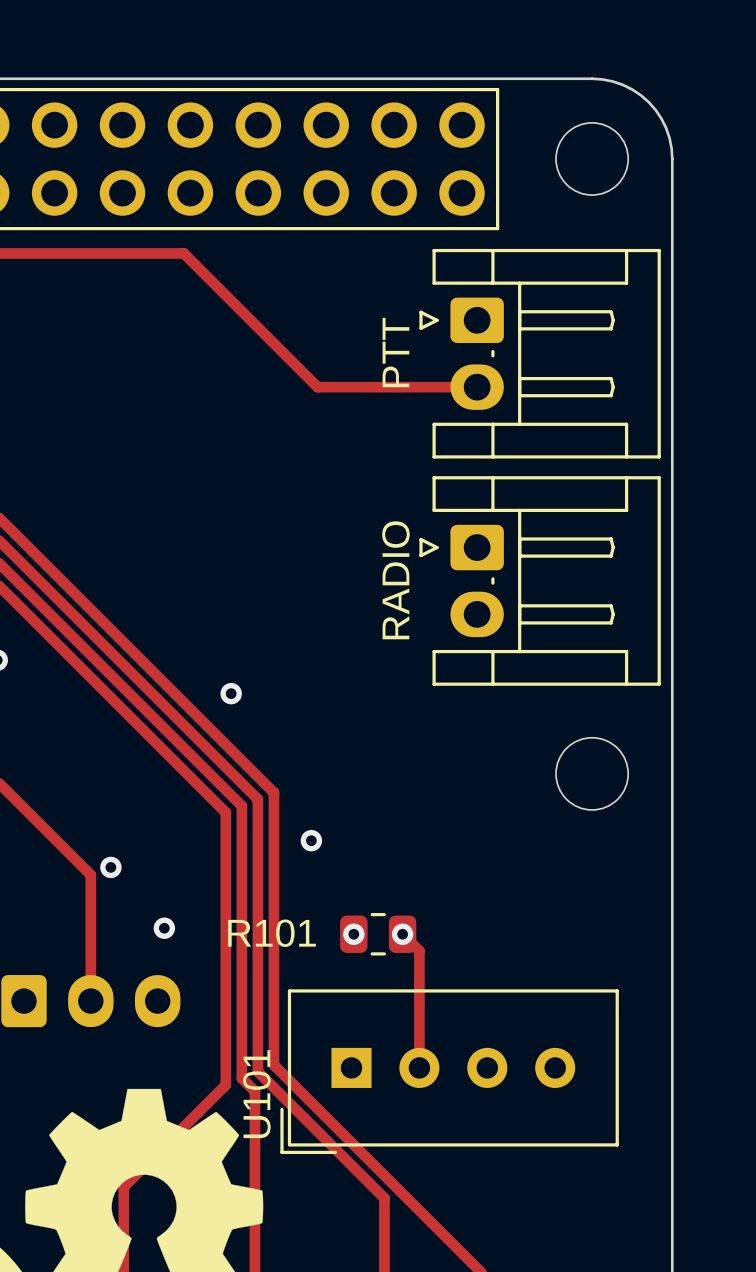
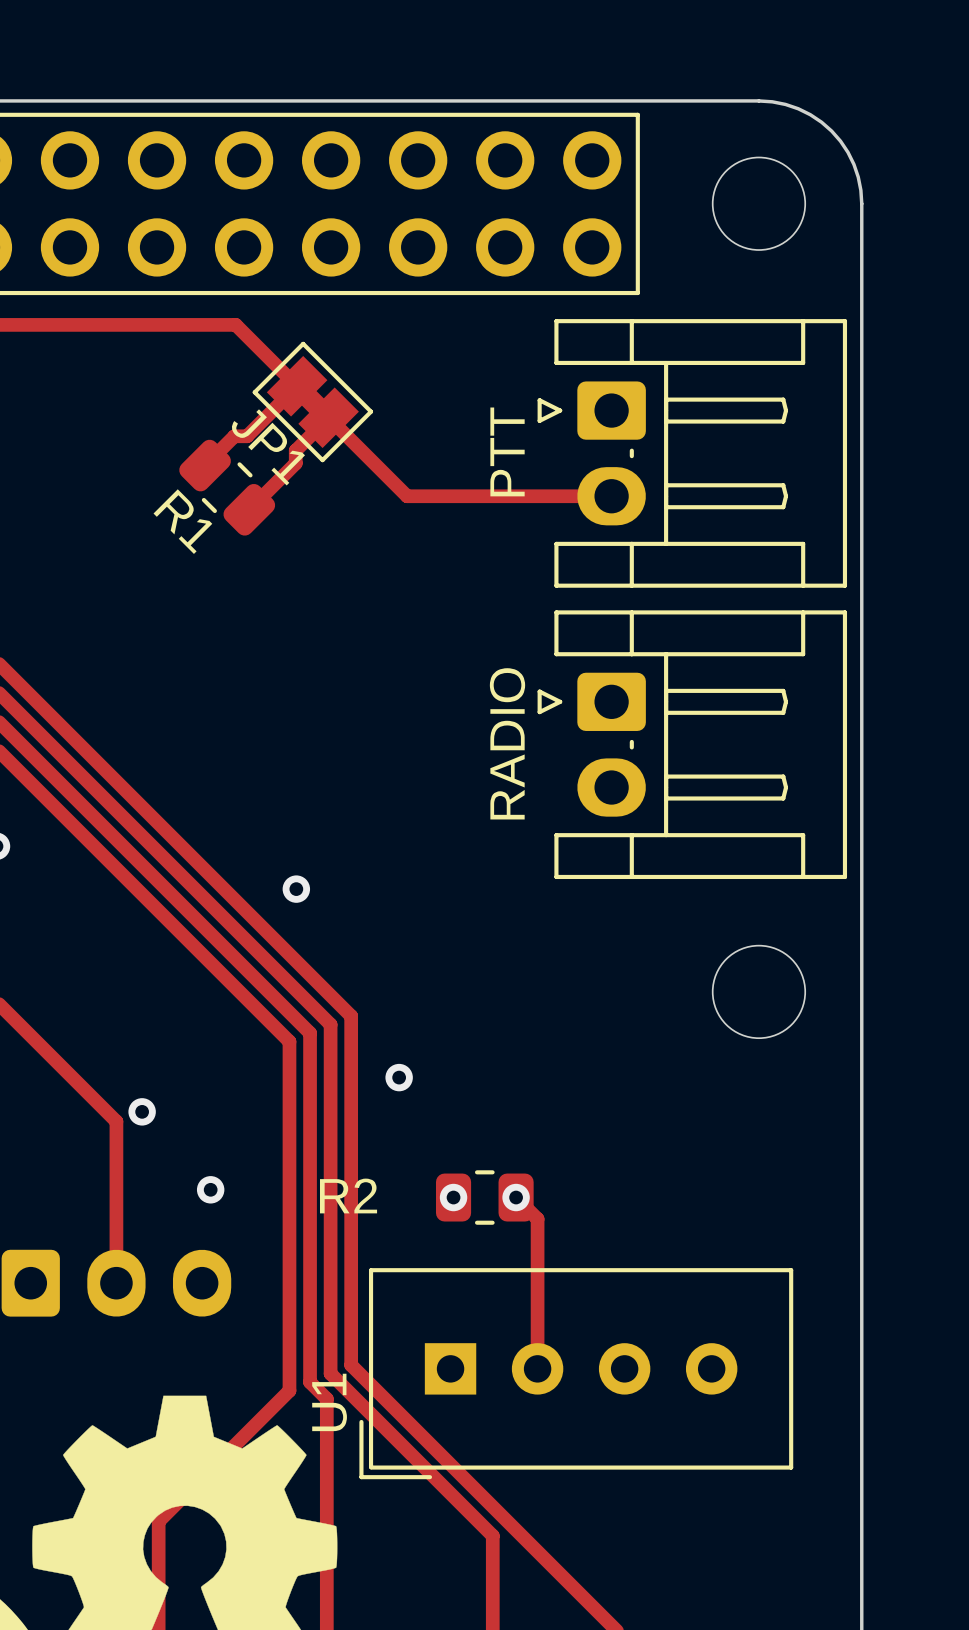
track: (231, 301) (256, 325) -> (249, 509) (295, 463) (295, 450) (328, 417)
track: none -> (297, 386) (247, 436) (234, 436) (205, 465)
JP1: none -> (312, 402)
R1: none -> (227, 487)
R101 name: R101 (271, 933) -> R2 (348, 1195)
U101 name: U101 (256, 1094) -> U1 (329, 1402)

